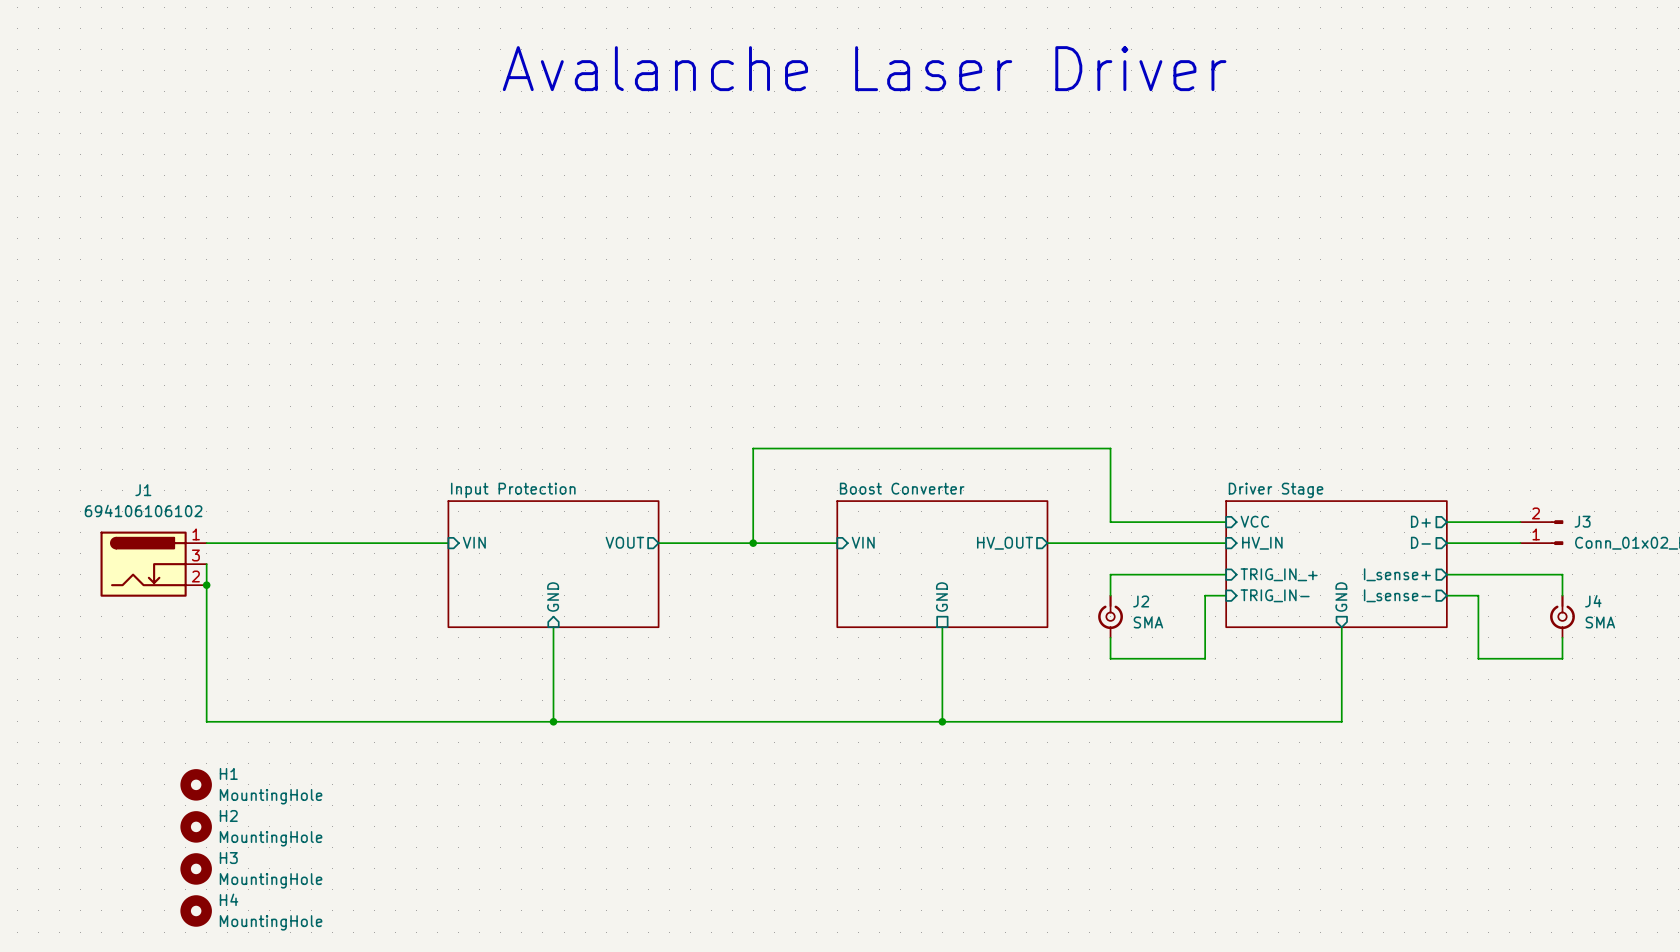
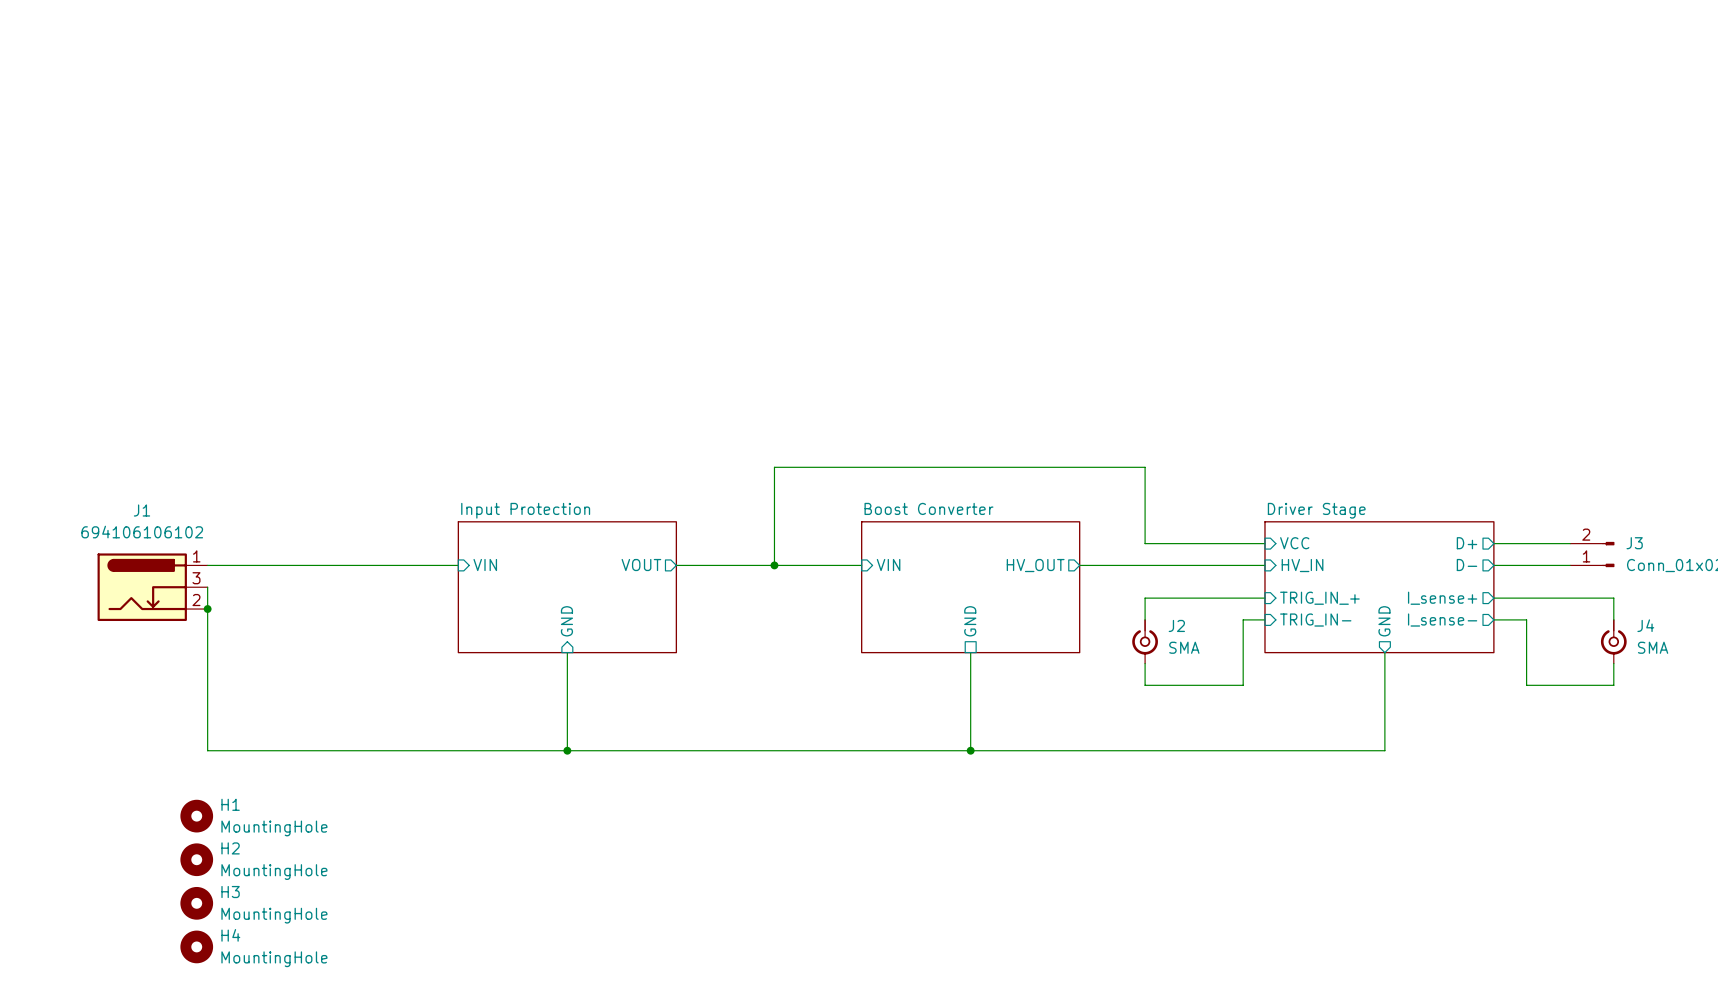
text: Avalanche Laser Driver (864, 68) -> none

